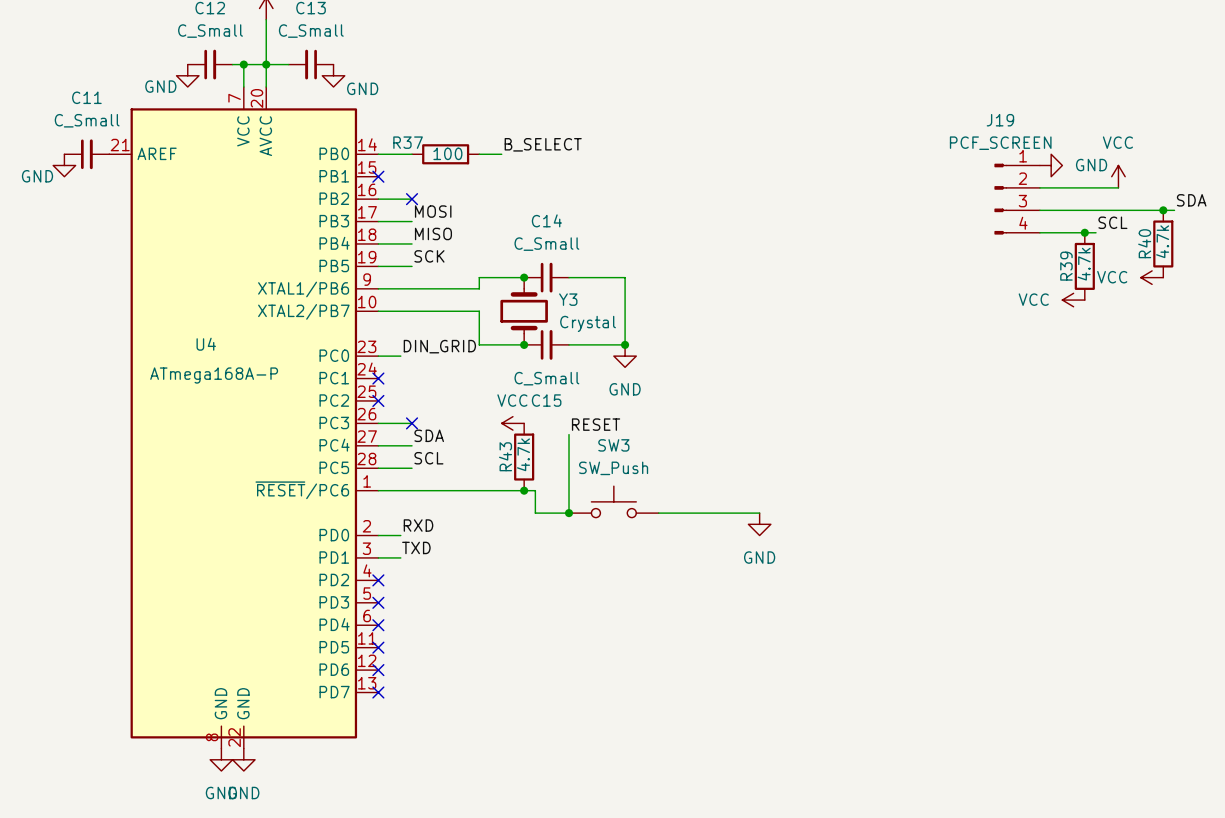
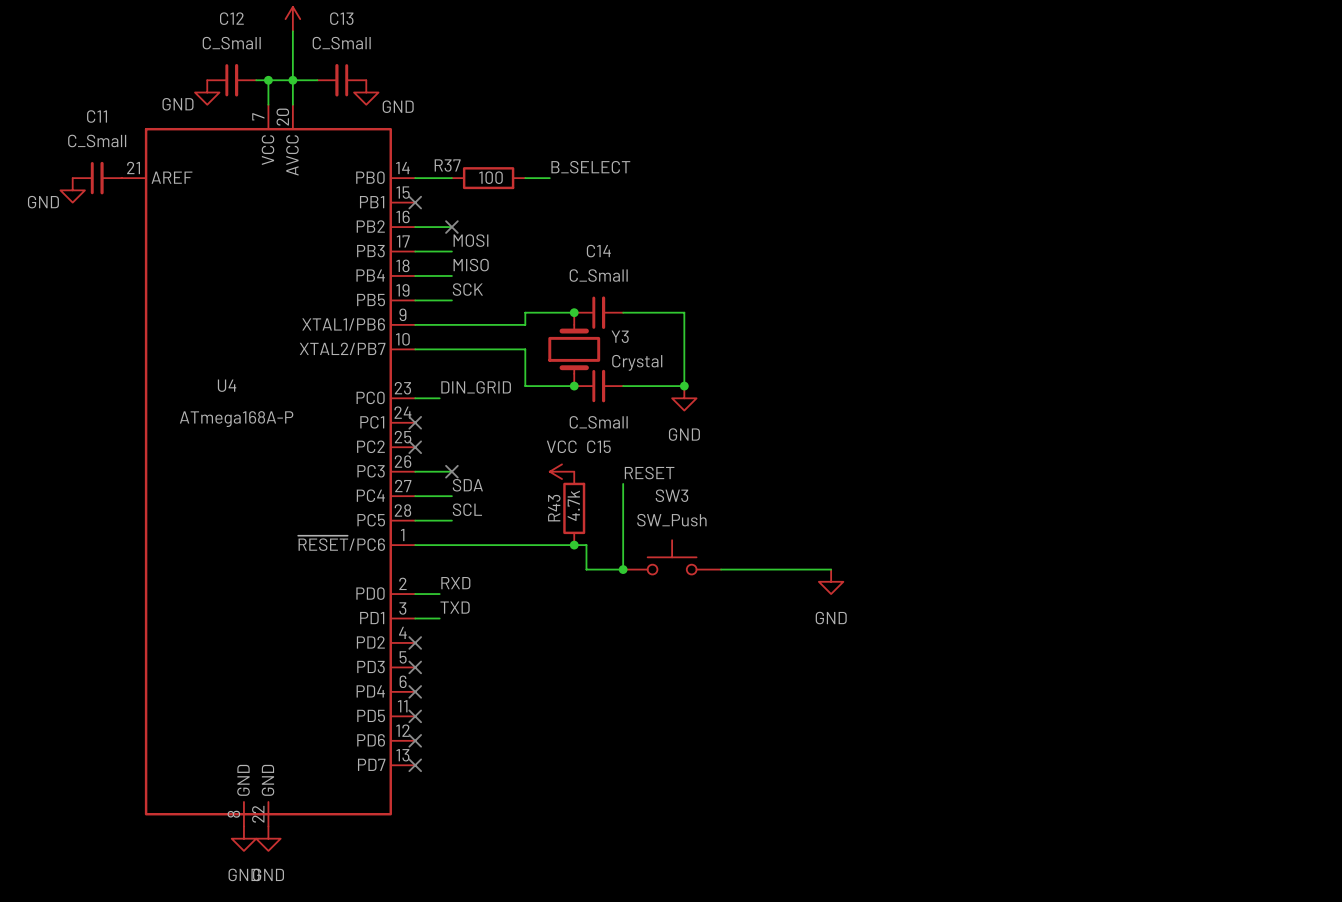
power symbol: GND (1051, 165) -> none
power symbol: VCC (1118, 176) -> none
wire: (1039, 187) (1118, 187) -> none
J19: PCF_SCREEN (1017, 199) -> none
label: SDA (1191, 200) -> none
wire: (1039, 210) (1174, 210) -> none
junction: (1163, 210) -> none
label: SCL (1112, 222) -> none
wire: (1039, 232) (1096, 232) -> none
junction: (1084, 232) -> none
R40: 4.7k (1163, 243) -> none
R39: 4.7k (1084, 266) -> none
power symbol: VCC (1152, 277) -> none
power symbol: VCC (1073, 300) -> none

